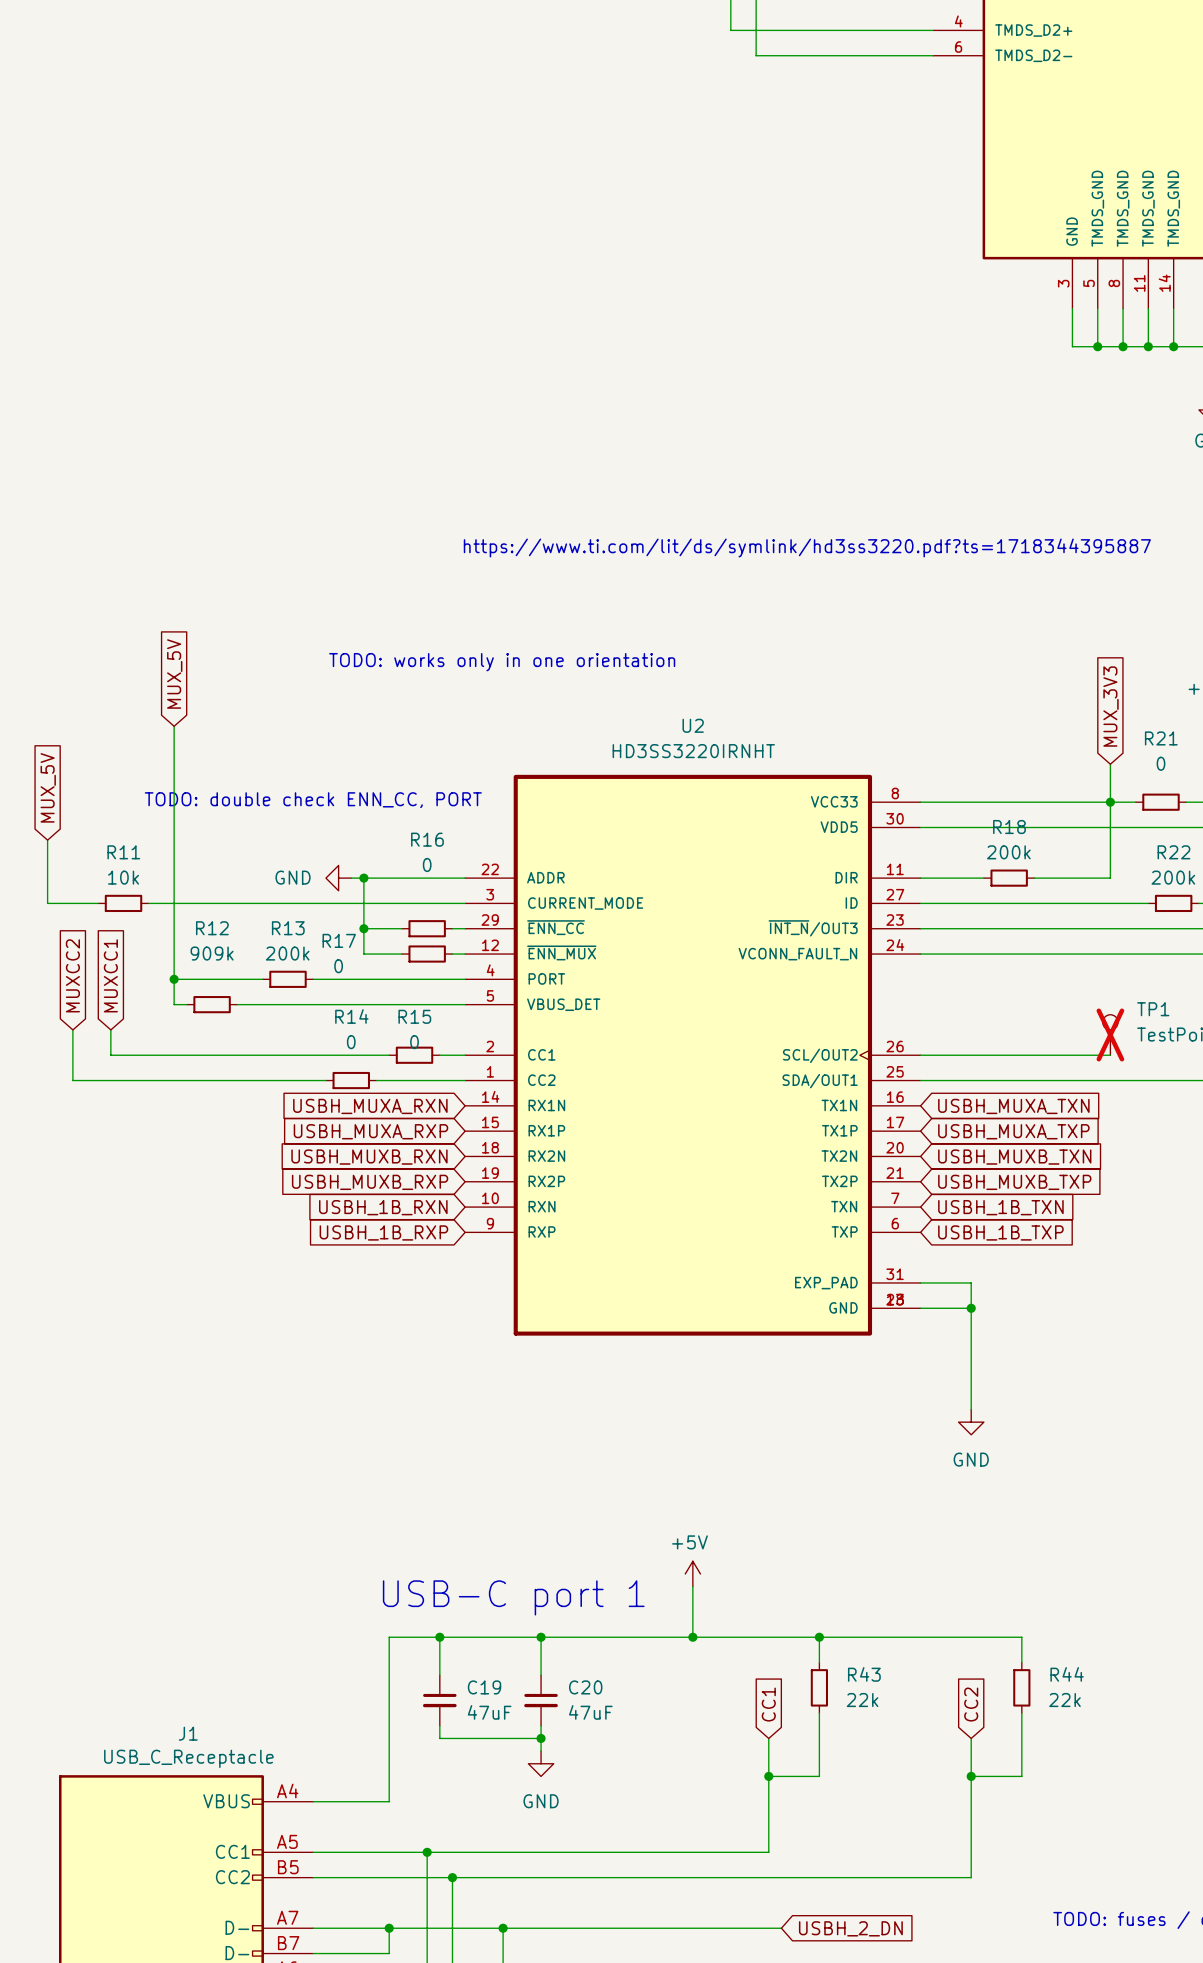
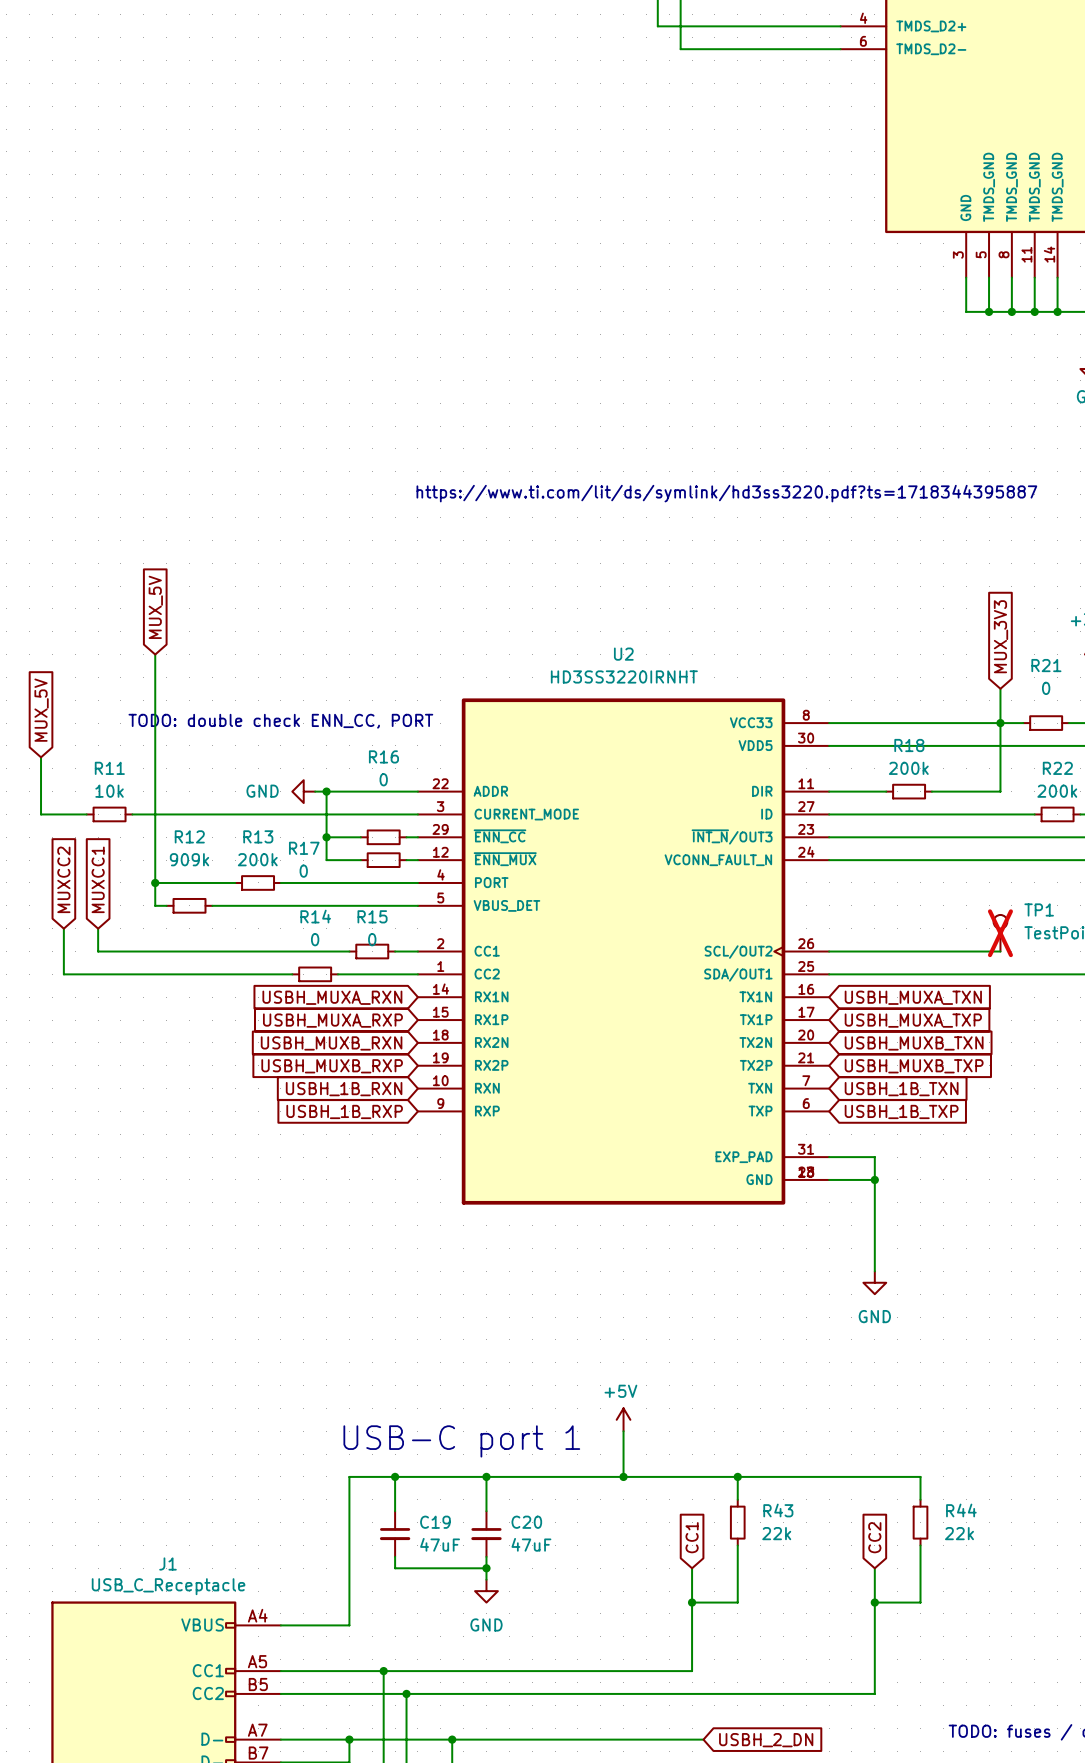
text: TODO: works only in one orientation (502, 662) -> none

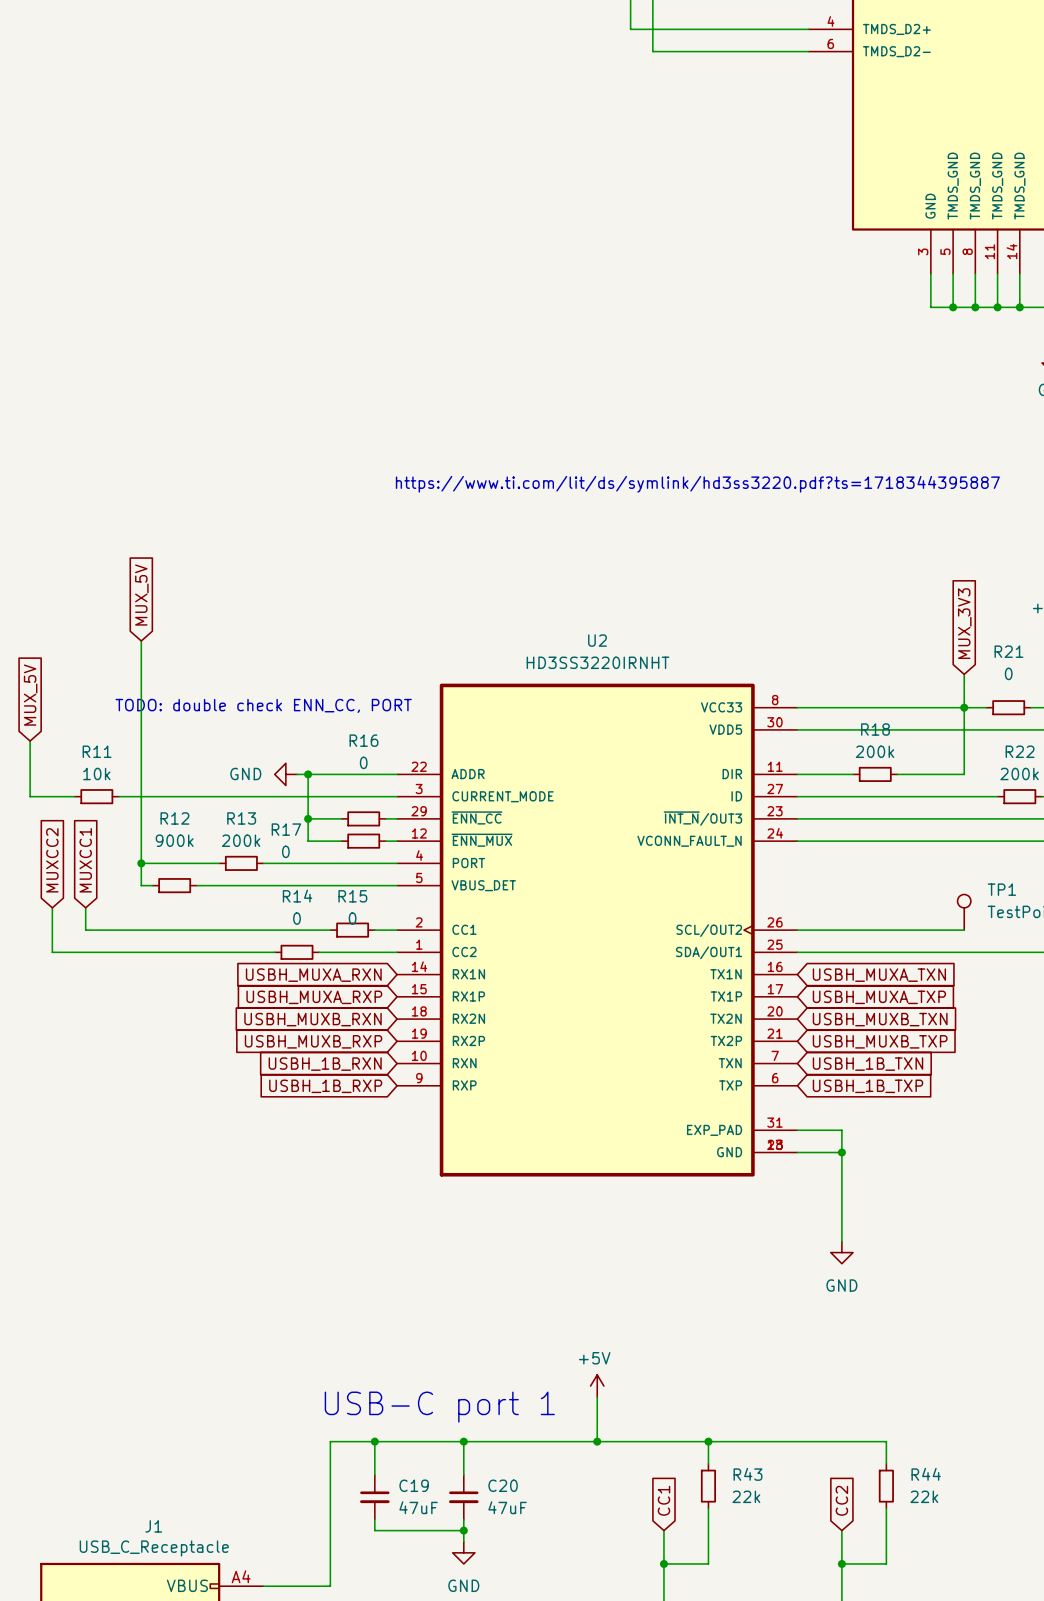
R12 value: 909k (189, 859) -> 900k (174, 840)
TP1 do-not-place cross: (1000, 933) -> none

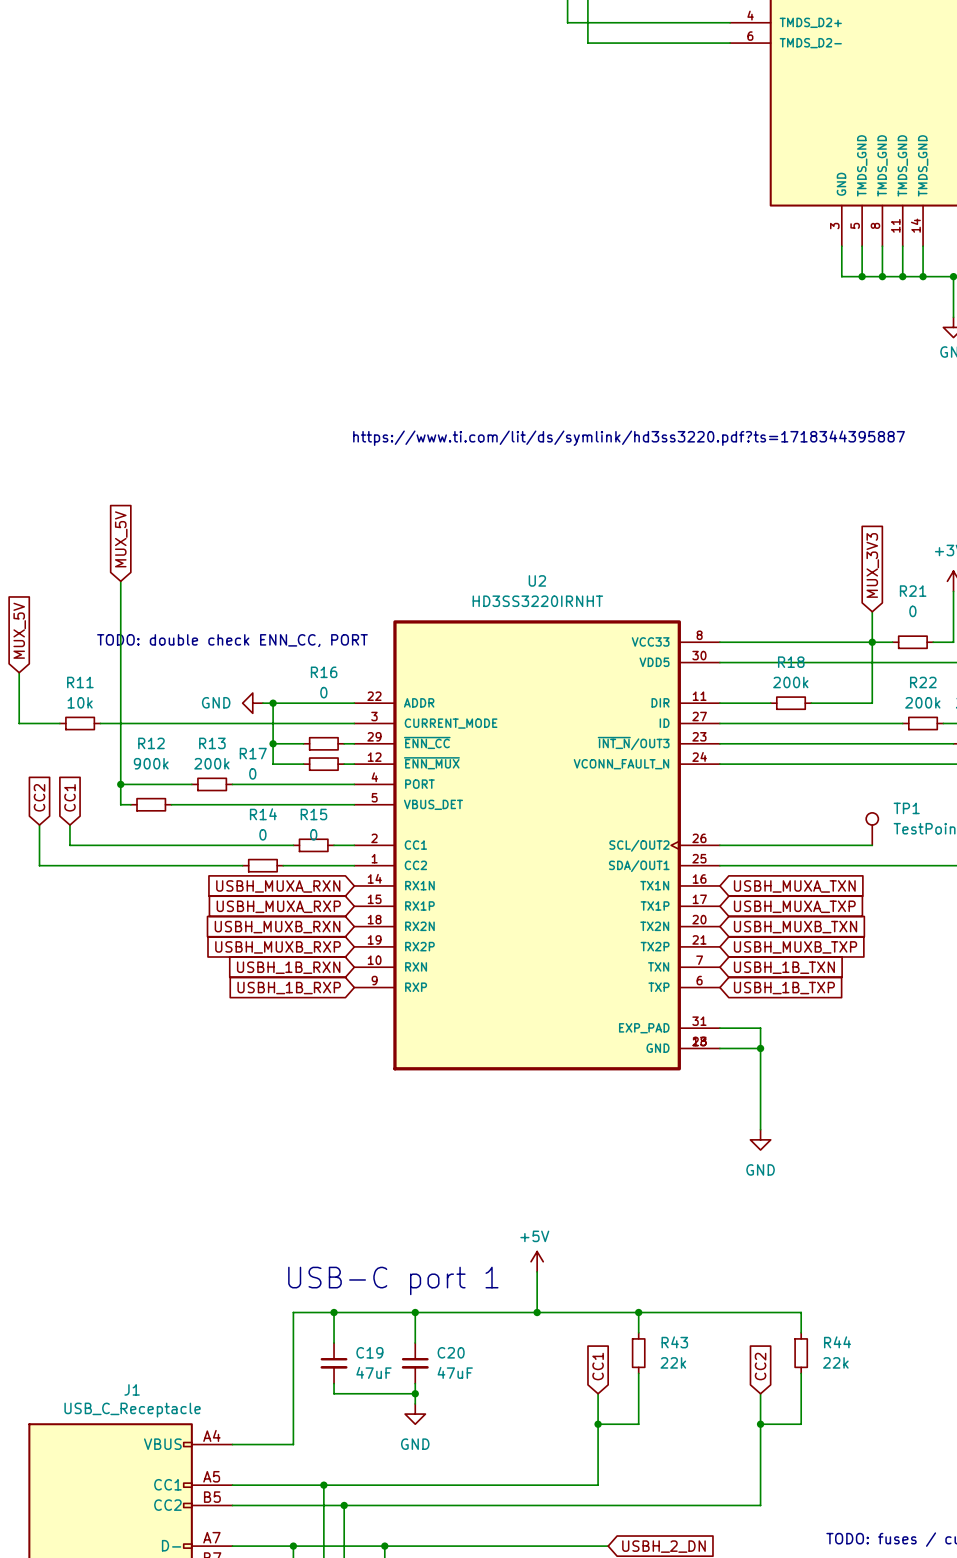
global label: MUXCC2 (52, 860) -> CC2 (39, 797)
global label: MUXCC1 (85, 860) -> CC1 (69, 797)

